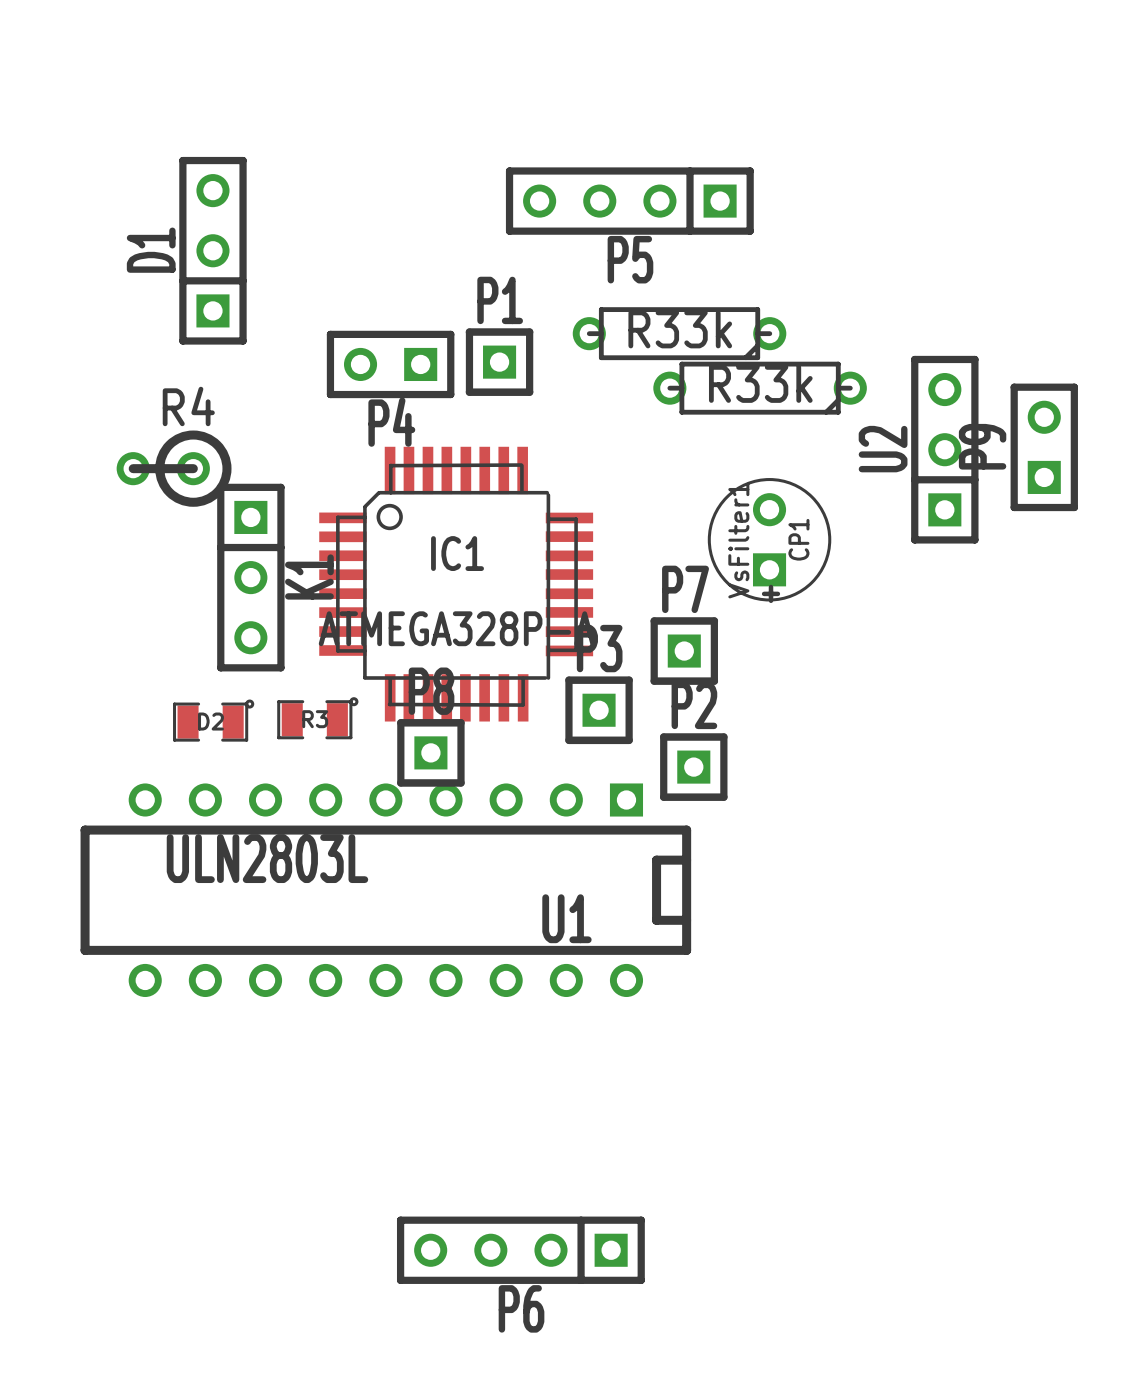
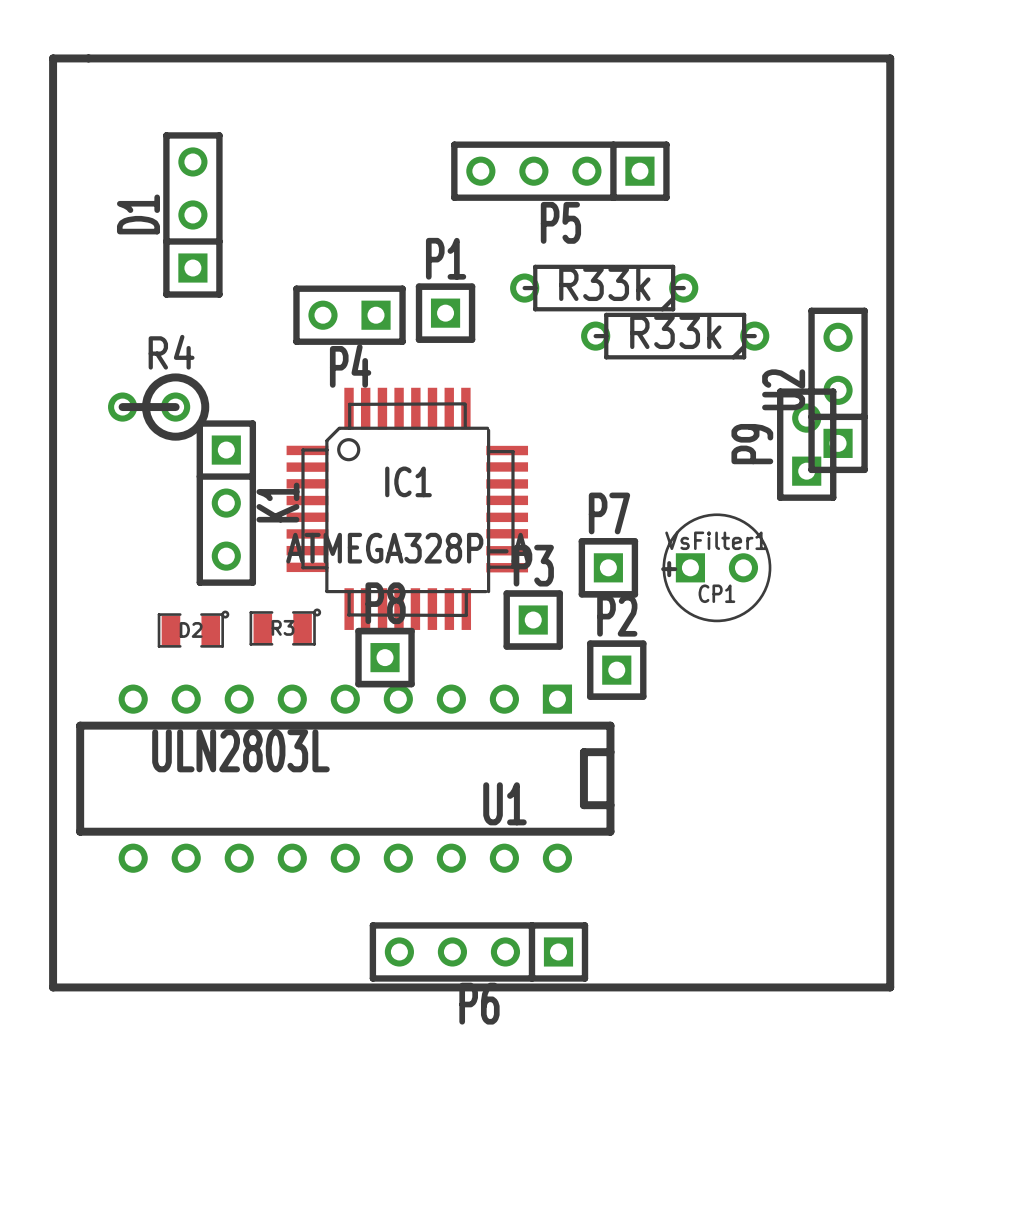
line: none -> (53, 58) (890, 58) (890, 987) (53, 987) (53, 58)
P9 position: (1044, 447) -> (806, 444)
VsFilter1 rotation: 0° (769, 539) -> 90° clockwise (716, 567)
VsFilter1 position: (769, 539) -> (716, 567)
P6 position: (520, 1250) -> (478, 951)

